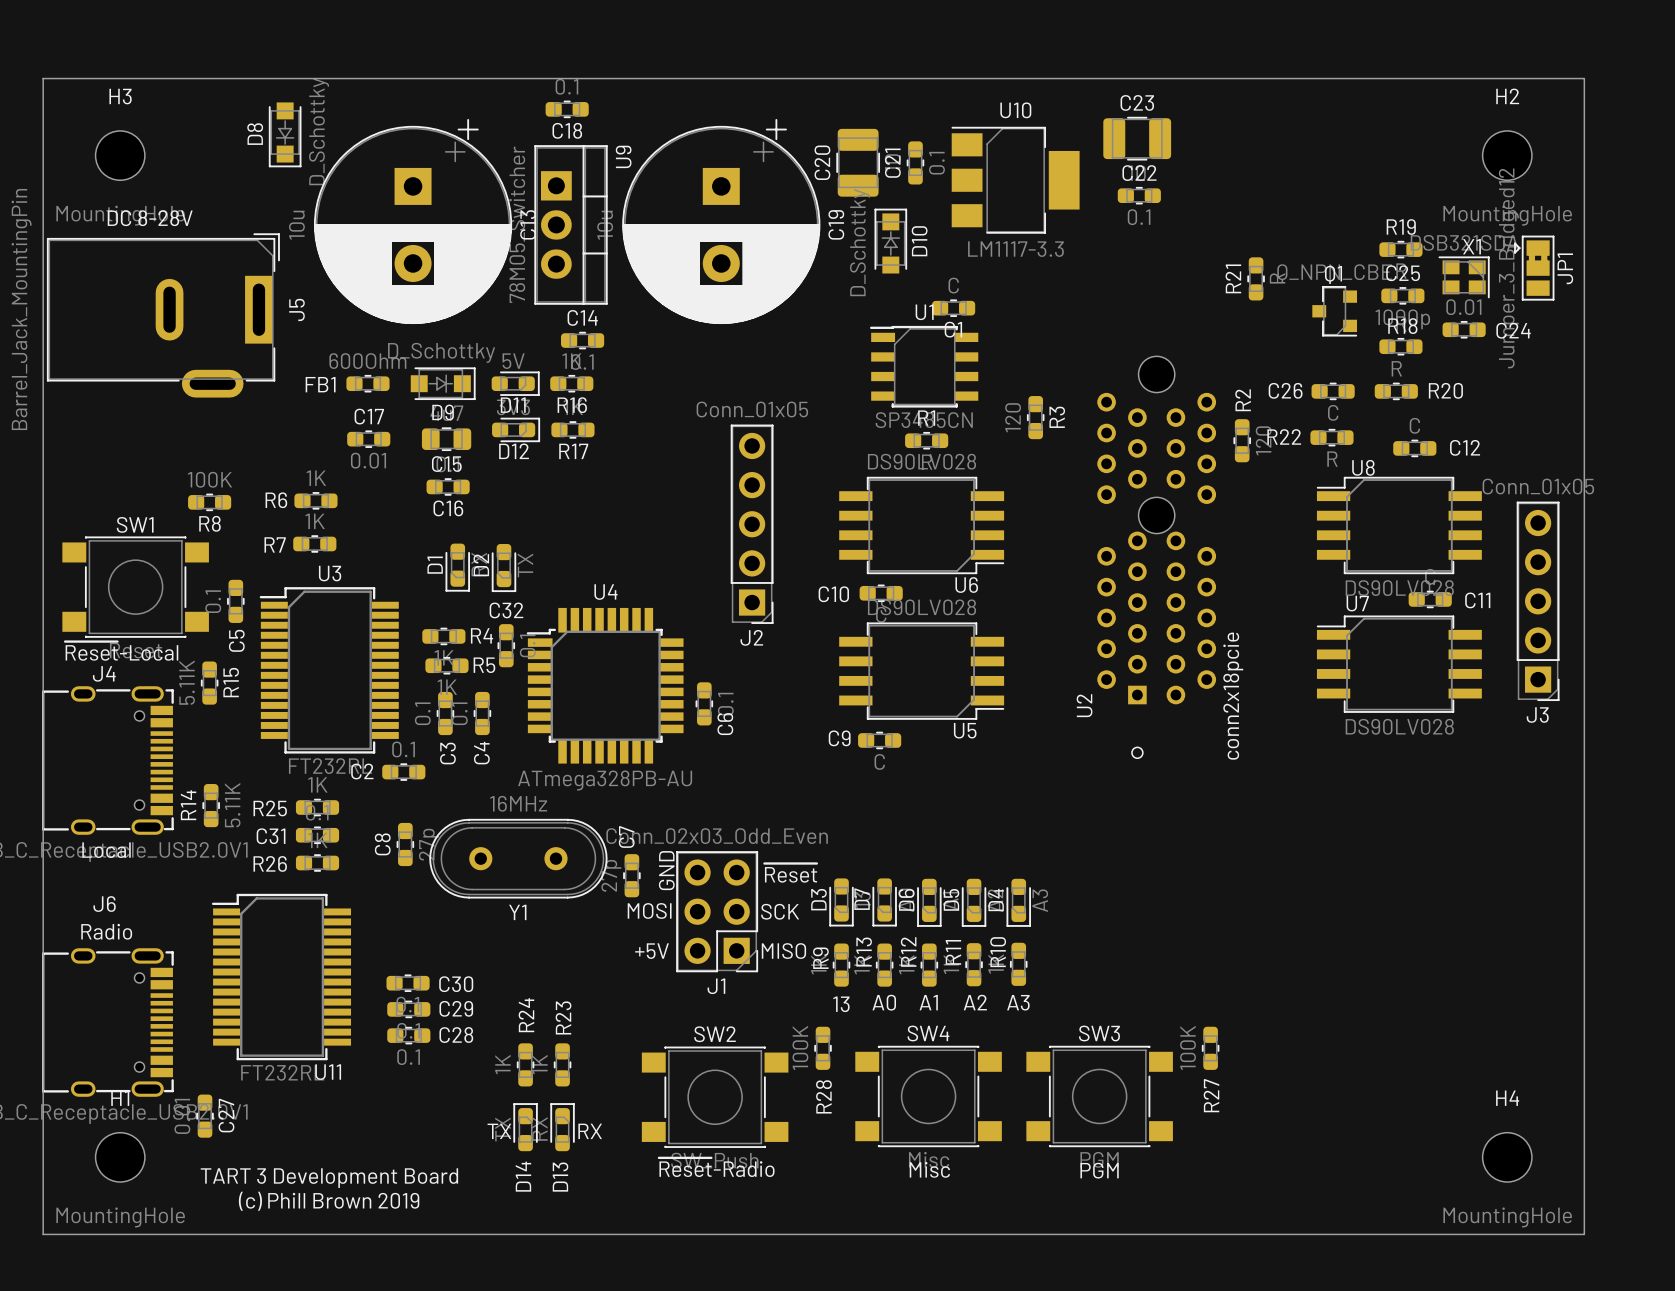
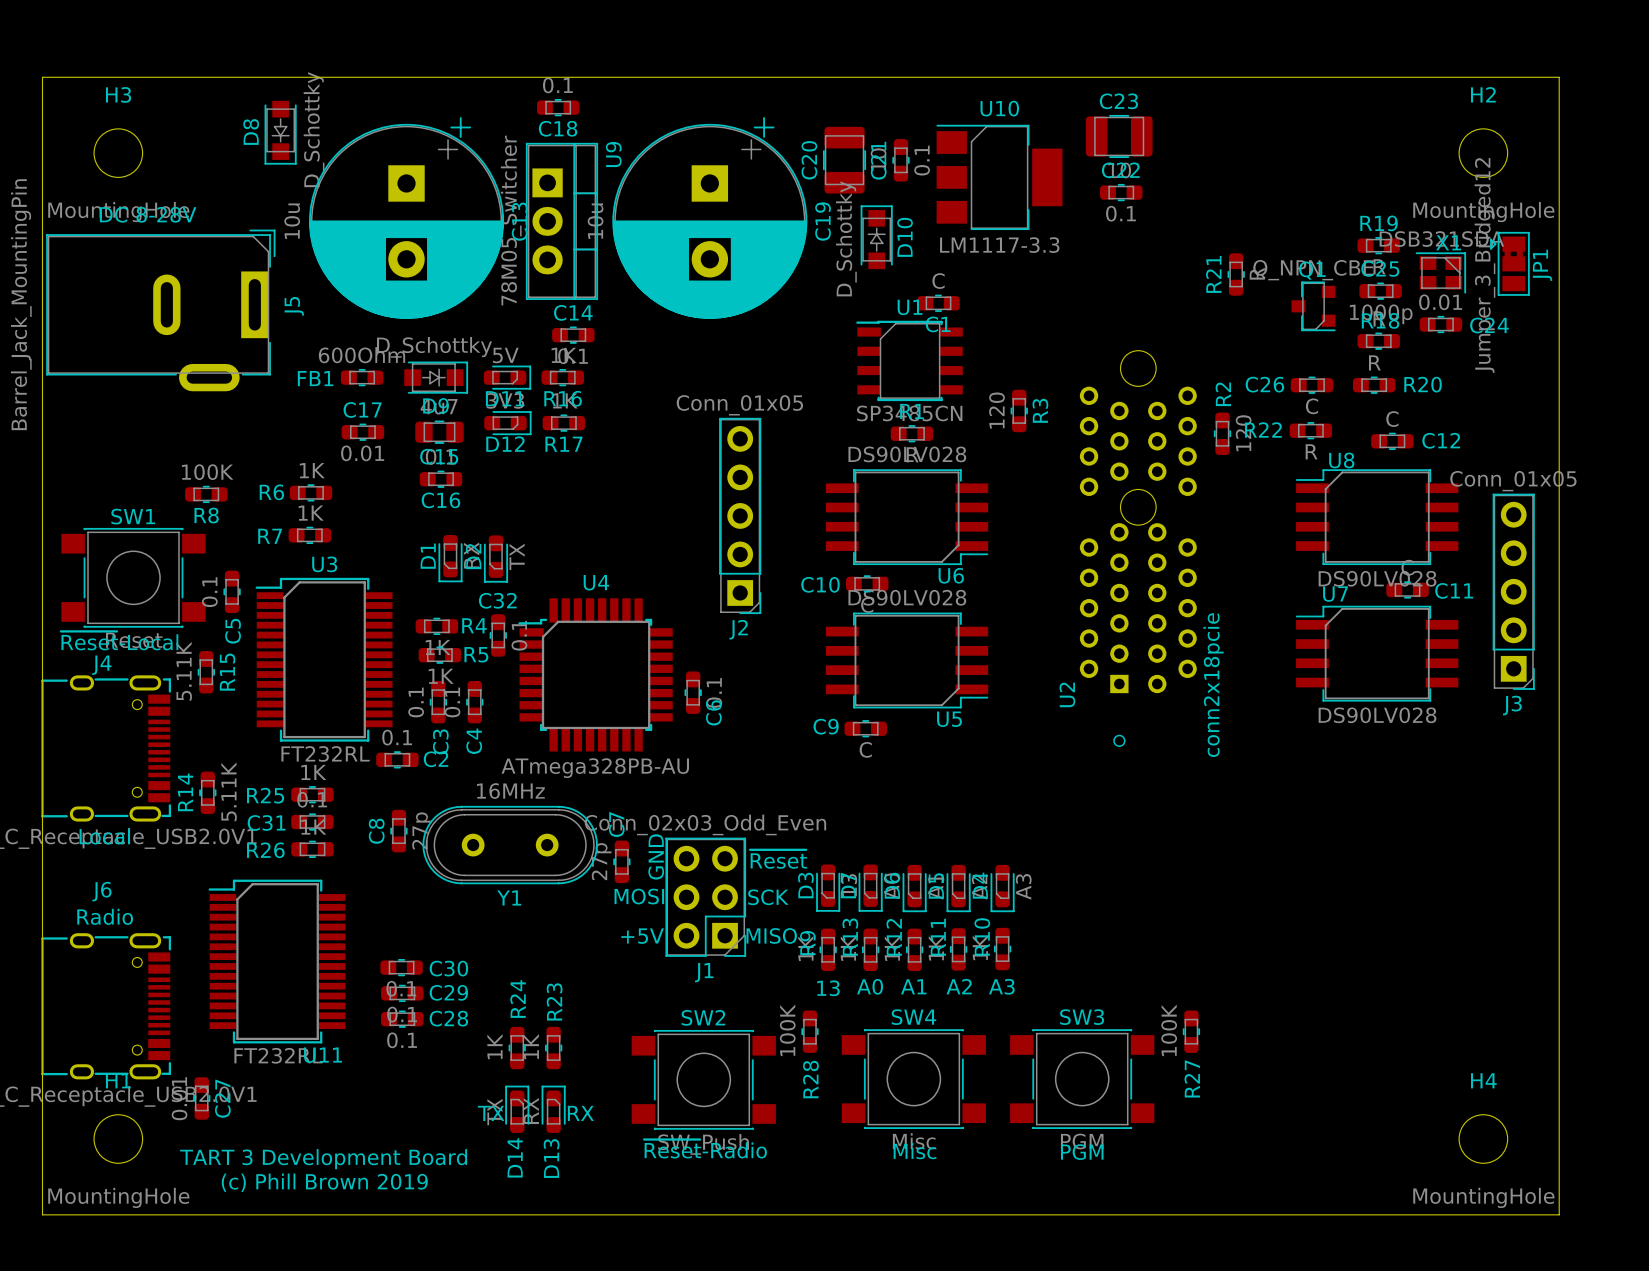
C2 name position: C2 (362, 771) -> C2 (436, 759)

